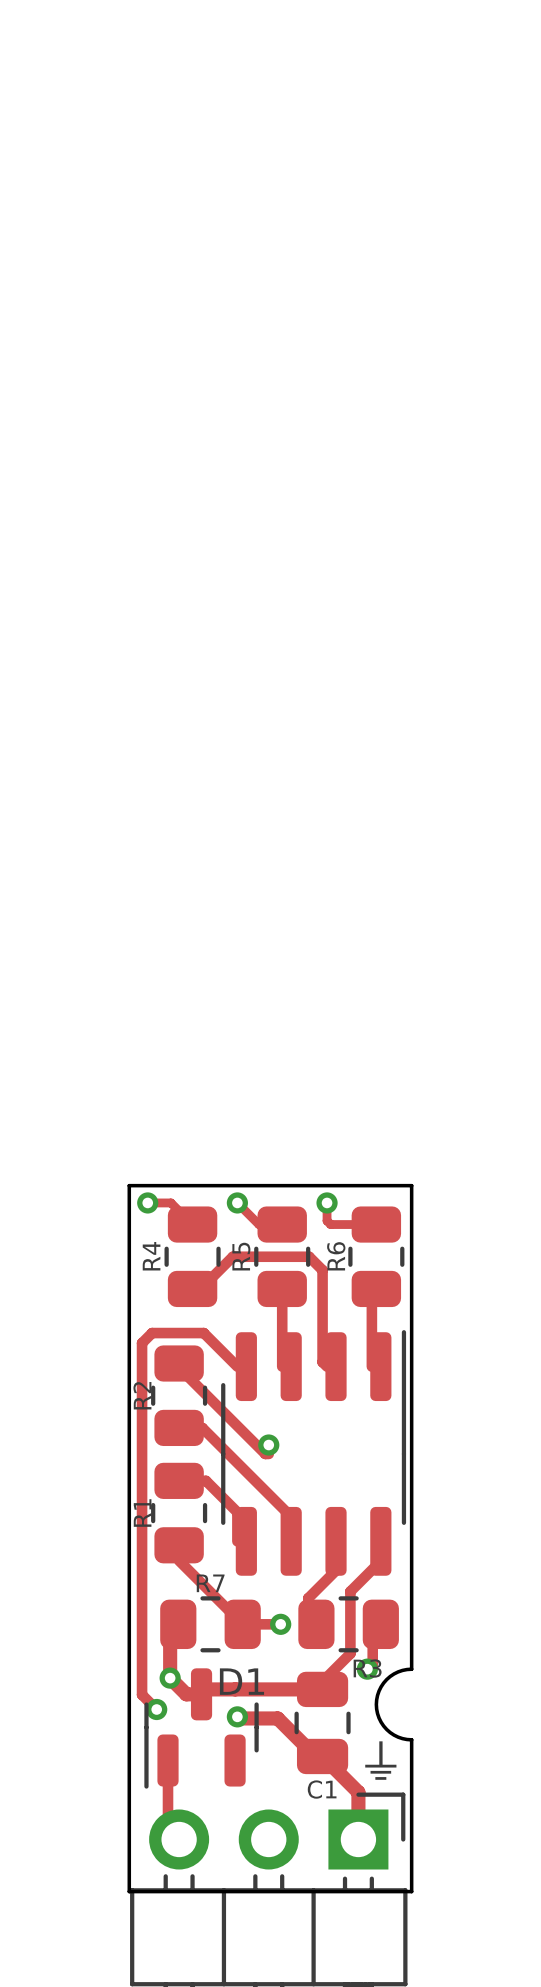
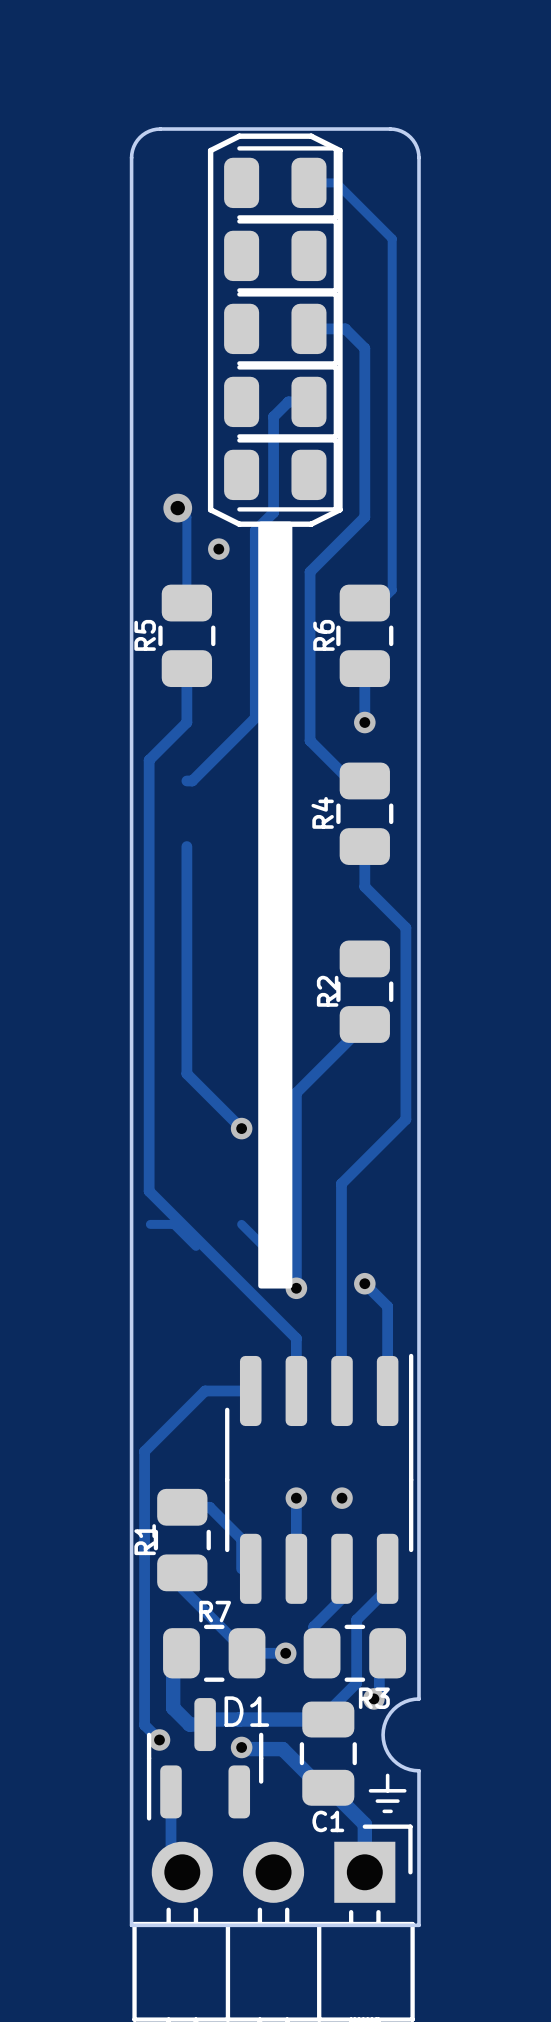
line: none -> (239, 136) (210, 150) (210, 509) (239, 524) (311, 524) (339, 509) (339, 150) (311, 136) (239, 136)
part: none -> (281, 182)
track: none -> (308, 182) (336, 182) (392, 238) (392, 590) (379, 603) (364, 603)
part: none -> (281, 255)
part: none -> (281, 328)
track: none -> (308, 328) (345, 328) (364, 348) (364, 517) (310, 571) (310, 740) (350, 780) (364, 780)
part: none -> (281, 401)
track: none -> (308, 401) (288, 401) (273, 416) (273, 512) (255, 530) (255, 717) (192, 780) (186, 780)
part: none -> (281, 474)
track: none -> (177, 508) (186, 517) (186, 603)
via: none -> (177, 508)
drawing: none -> [258, 521, 293, 1289]
via: none -> (218, 549)
track: none -> (186, 668) (186, 722) (149, 760) (149, 1191) (296, 1338) (296, 1390)
track: none -> (364, 668) (364, 722)
via: none -> (364, 722)
track: none -> (186, 846) (186, 1073) (241, 1128)
track: none -> (364, 846) (364, 886) (405, 927) (405, 1119) (341, 1183) (342, 1390)
track: none -> (364, 1024) (296, 1092) (296, 1288)
via: none -> (241, 1128)
board edge: (129, 1185) (411, 1185) -> (131, 1206) (131, 157) (133, 146) (140, 137) (149, 131) (160, 129) (394, 129) (407, 134) (418, 150) (418, 1206)
via: (147, 1202) -> none
via: (237, 1202) -> none
track: (327, 1202) (327, 1220) (330, 1224) (376, 1224) -> none
via: (327, 1202) -> none
R4 position: (192, 1256) -> (364, 813)
R5 position: (282, 1256) -> (186, 635)
R6 position: (376, 1256) -> (364, 635)
track: none -> (364, 1283) (387, 1306) (387, 1390)
via: none -> (364, 1283)
via: none -> (296, 1288)
track: (192, 1288) (200, 1288) (232, 1256) (309, 1256) (322, 1270) (322, 1362) (327, 1366) -> none
track: (282, 1288) (282, 1366) -> none
track: (376, 1288) (371, 1293) (371, 1366) -> none
track: (179, 1363) (179, 1367) (265, 1453) (268, 1453) -> none
track: (237, 1366) (203, 1333) (152, 1333) (142, 1343) (142, 1426) -> (241, 1390) (205, 1390) (144, 1451)
R2 position: (179, 1395) -> (364, 991)
track: (179, 1427) (202, 1427) (291, 1516) -> (296, 1498) (296, 1543)
via position: (268, 1445) -> (296, 1498)
via: none -> (342, 1498)
via: (170, 1678) -> none

